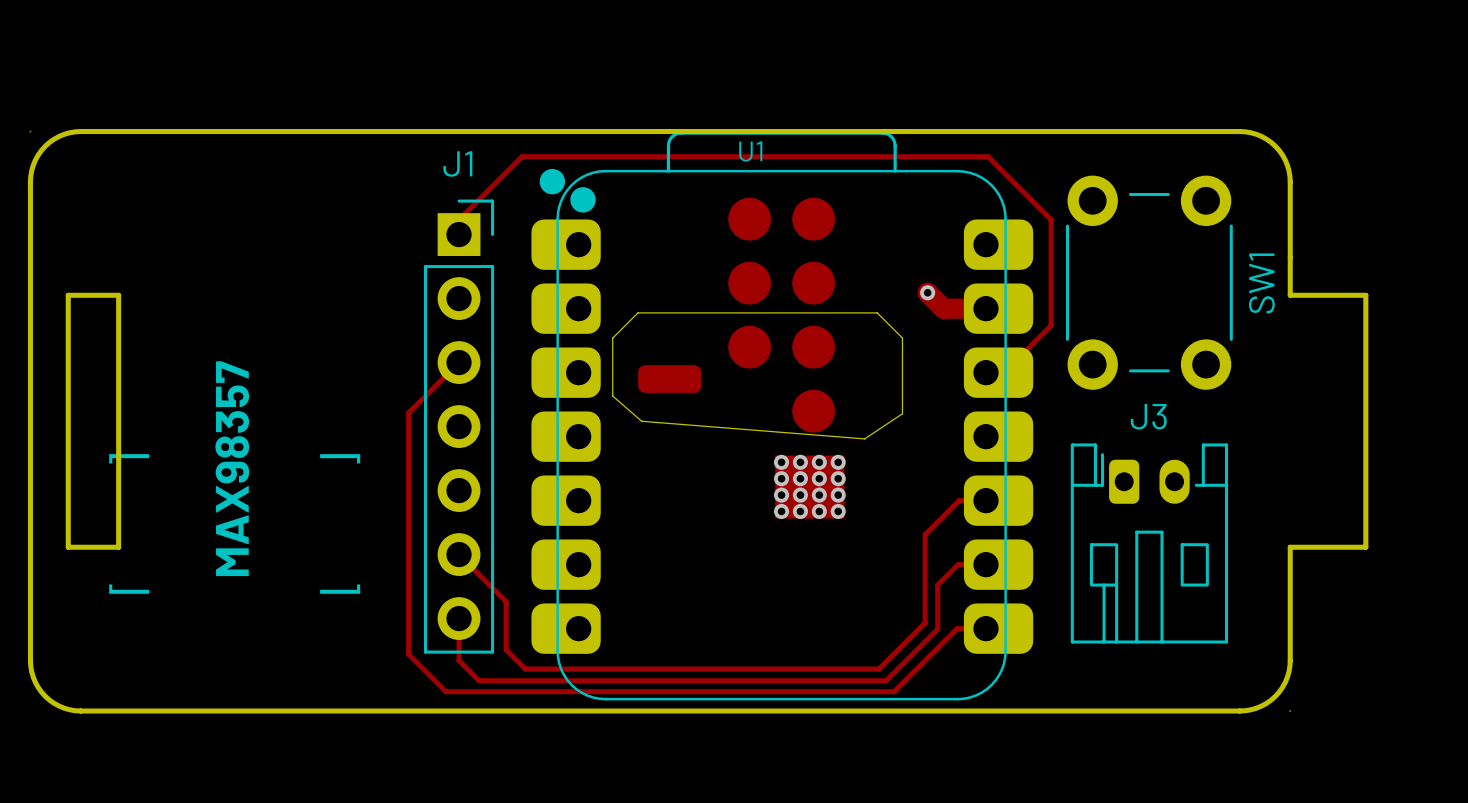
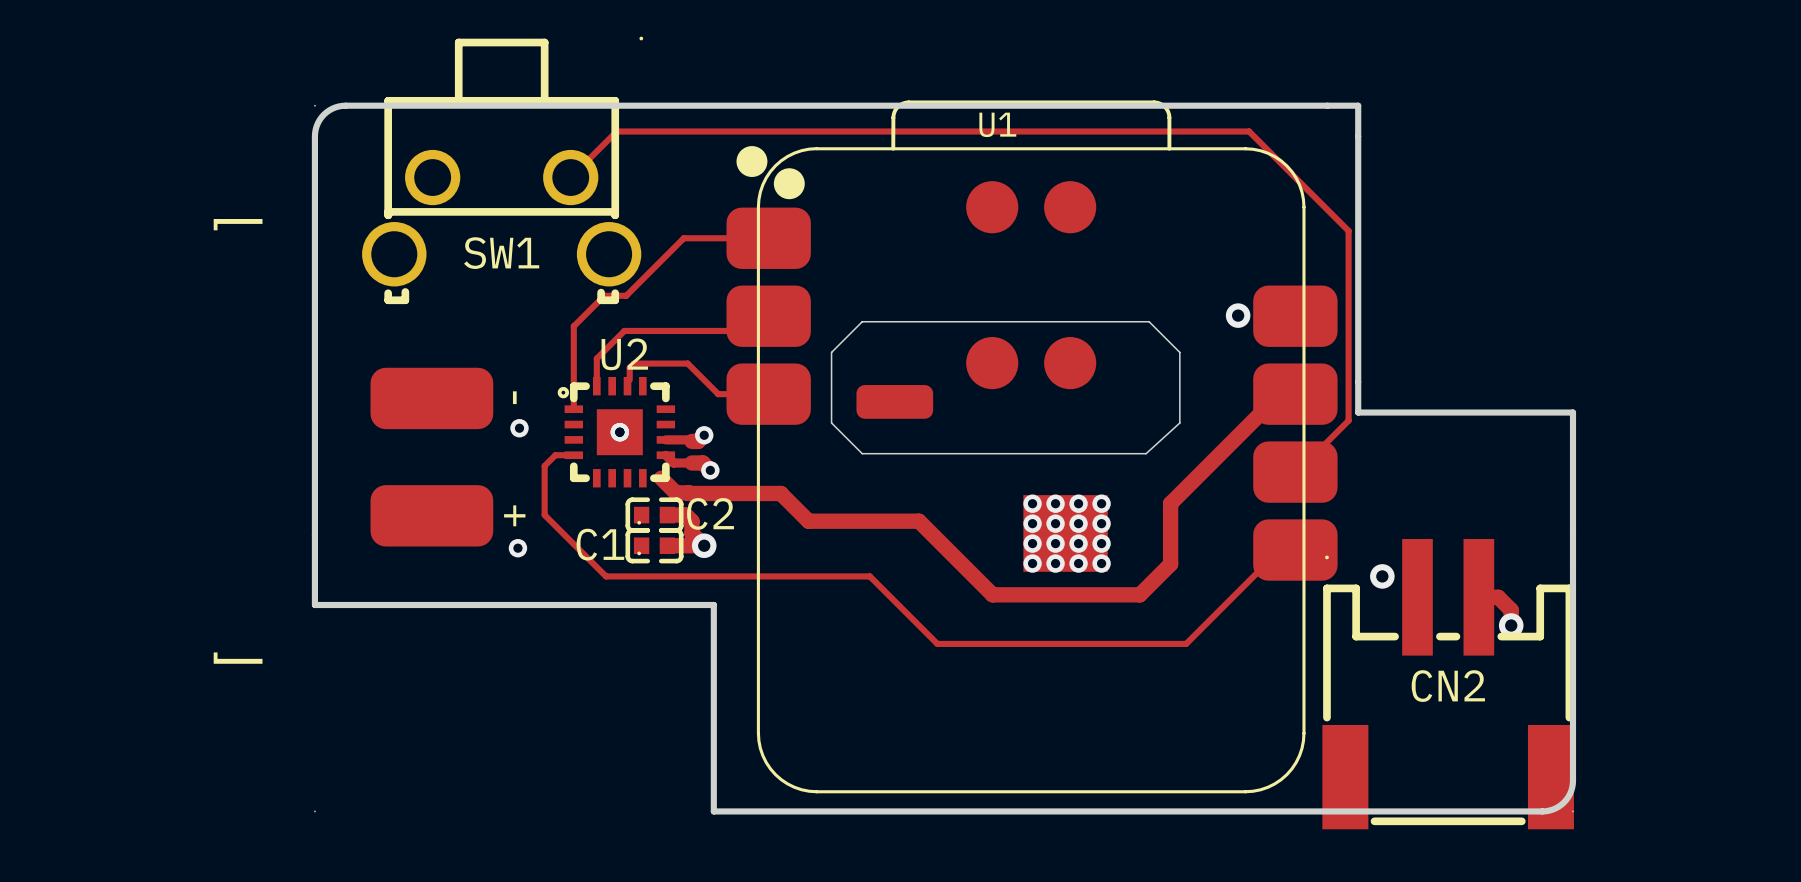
round board edge position: (30, 131) -> (314, 105)
board edge: (80, 131) (1239, 131) (1256, 134) (1275, 146) (1282, 155) (1288, 170) (1290, 295) (1365, 295) (1365, 547) (1290, 547) (1288, 671) (1282, 687) (1271, 700) (1261, 706) (1245, 710) (80, 711) (64, 708) (49, 700) (41, 692) (33, 677) (30, 666) (30, 181) (35, 160) (45, 146) (58, 136) (80, 131) -> (345, 105) (335, 107) (326, 112) (319, 120) (315, 132) (314, 604) (713, 604) (713, 811) (1542, 811) (1558, 806) (1568, 797) (1572, 780) (1572, 412) (1358, 412) (1358, 105) (345, 105)
U1 footprint: [531, 131, 1034, 701] -> [726, 100, 1338, 794]
track: (522, 156) (459, 219) (459, 234) -> (716, 131) (616, 131) (570, 177)
track: (959, 156) (988, 156) (1051, 219) (1051, 325) (1004, 372) -> (1249, 131) (1348, 230) (1348, 420) (1297, 472) (1280, 472)
SW1 footprint: [1066, 175, 1233, 390] -> [362, 36, 644, 305]
track: none -> (784, 238) (683, 238) (626, 295) (604, 295) (573, 326) (573, 409)
SW1 name position: SW1 (1261, 283) -> SW1 (501, 253)
track: (927, 292) (943, 308) (985, 308) -> none
via: (927, 292) -> none
board edge: (68, 295) (68, 547) (118, 547) (118, 295) (68, 295) -> none
via: none -> (1238, 315)
track: none -> (784, 316) (769, 330) (624, 330) (596, 358) (596, 386)
board edge: (641, 312) (637, 312) (612, 338) (612, 396) (641, 421) (864, 438) (902, 413) (902, 396) -> (862, 321) (831, 352) (831, 423) (862, 453) (1146, 453) (1179, 423)
track: none -> (629, 380) (629, 367) (633, 363) (687, 363) (718, 394) (784, 394)
track: (459, 362) (408, 412) (408, 654) (446, 691) (894, 691) (957, 628) (985, 628) -> none
track: none -> (1280, 394) (1170, 503) (1170, 564) (1139, 594) (992, 594) (919, 521) (808, 521) (780, 493) (675, 492) (661, 478)
part: none -> (431, 398)
via: none -> (519, 428)
U2: none -> (616, 432)
via: none -> (619, 432)
track: none -> (704, 435) (698, 441) (665, 439)
via: none -> (704, 435)
track: none -> (573, 455) (555, 455) (544, 465) (544, 515) (606, 576) (869, 576) (937, 643) (1186, 643) (1280, 550)
track: none -> (665, 455) (673, 462) (702, 462) (710, 470)
J1: (459, 426) -> none
via: none -> (710, 470)
text: MAX98357 (232, 468) -> none
C2: none -> (654, 515)
track: none -> (667, 515) (685, 515) (691, 521) (691, 533) (704, 545) (667, 545)
part: none -> (431, 515)
C1: none -> (654, 545)
via: none -> (704, 545)
via: none -> (517, 548)
track: (985, 500) (959, 500) (925, 534) (925, 622) (878, 669) (525, 669) (506, 649) (506, 601) (459, 554) -> none
via: none -> (1382, 576)
text: ⌊ ⌋ (340, 523) -> none
track: none -> (1478, 597) (1498, 597) (1511, 610) (1511, 625)
J3: (1149, 543) -> none
via: none -> (1511, 625)
track: (985, 564) (958, 564) (937, 585) (937, 629) (886, 680) (479, 680) (459, 660) (459, 618) -> none
CN2: none -> (1448, 684)
round board edge position: (1290, 711) -> (1572, 811)
round board edge: none -> [314, 811, 316, 812]

